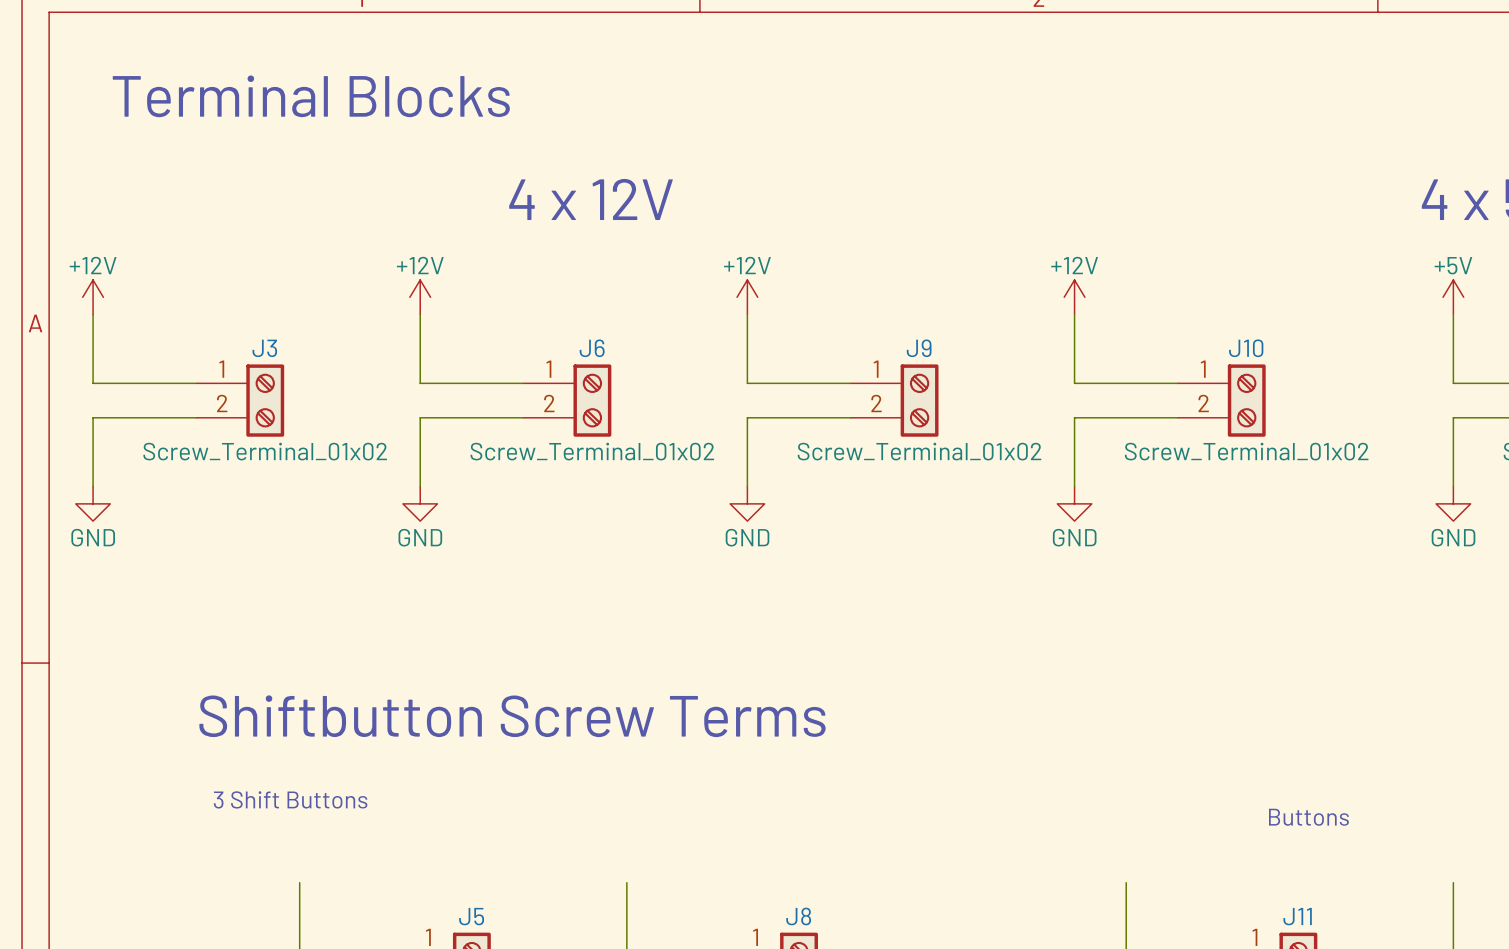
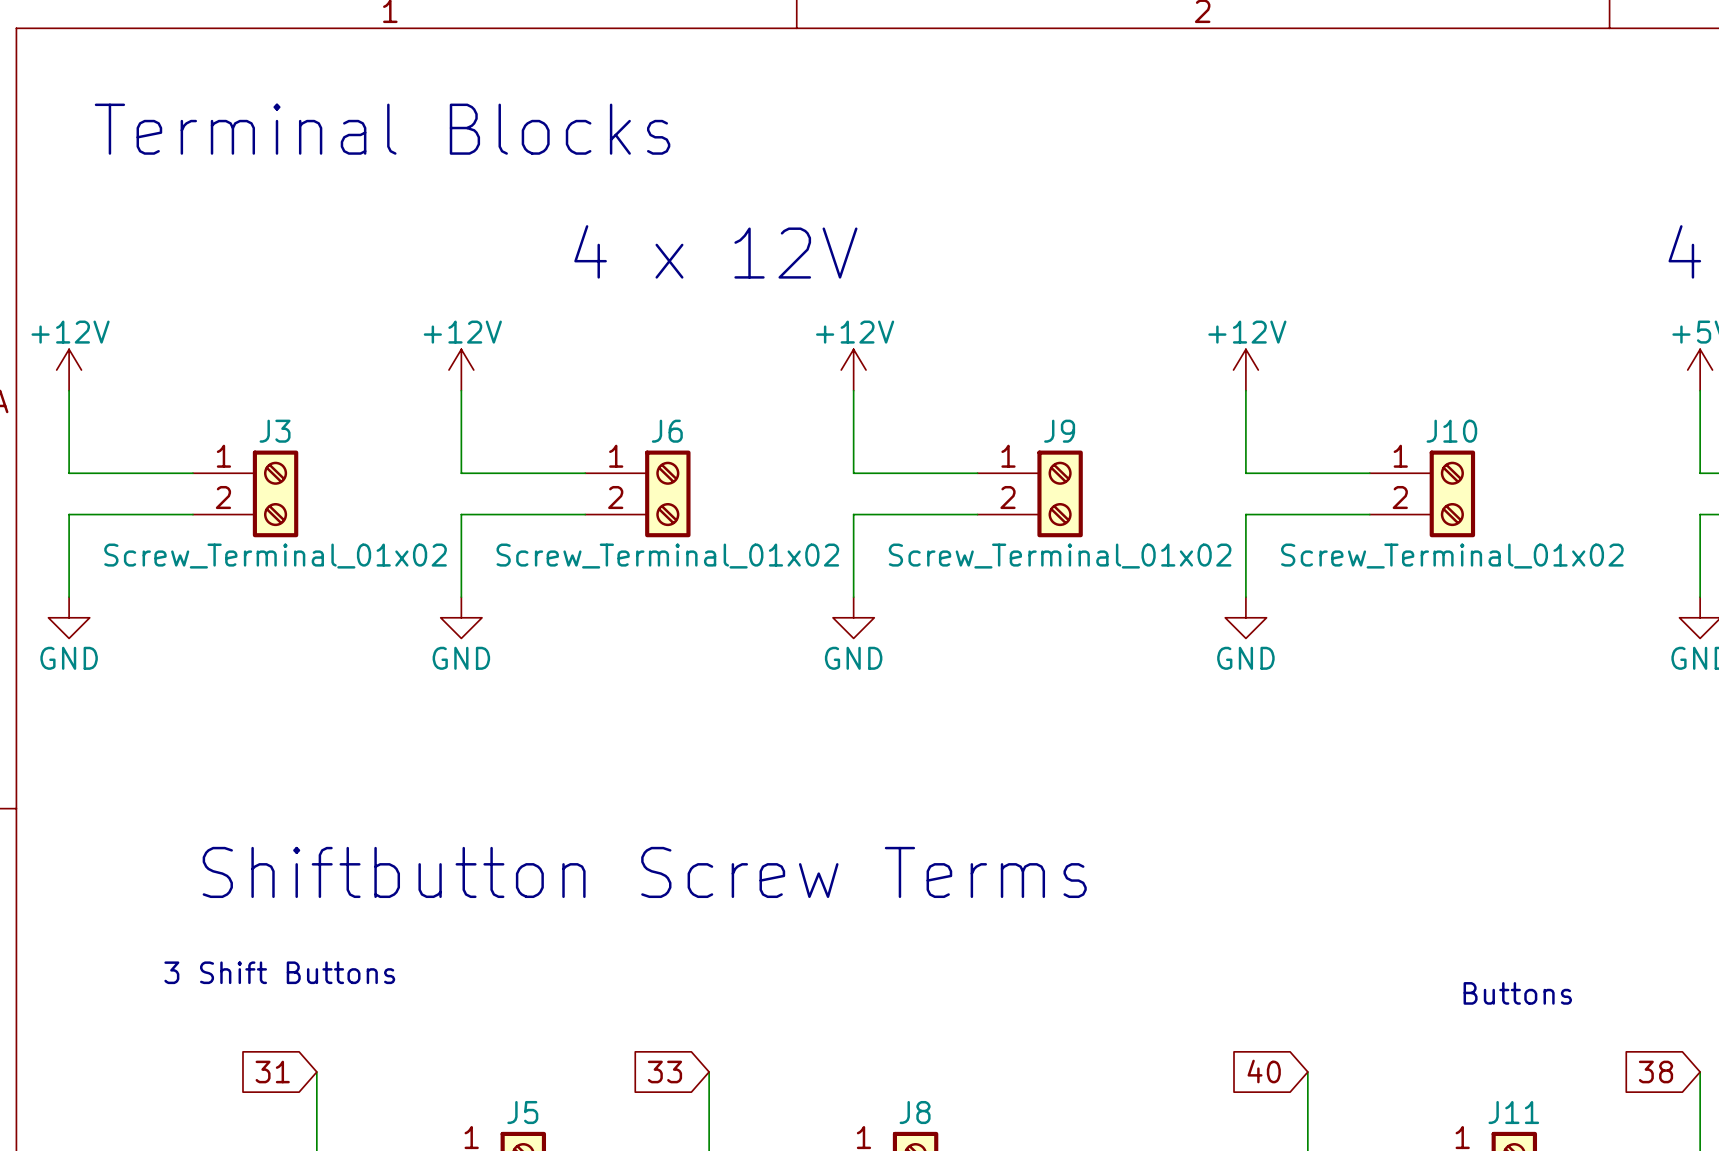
global label: none -> 31 (272, 1071)
global label: none -> 33 (664, 1071)
global label: none -> 40 (1264, 1071)
global label: none -> 38 (1655, 1071)

